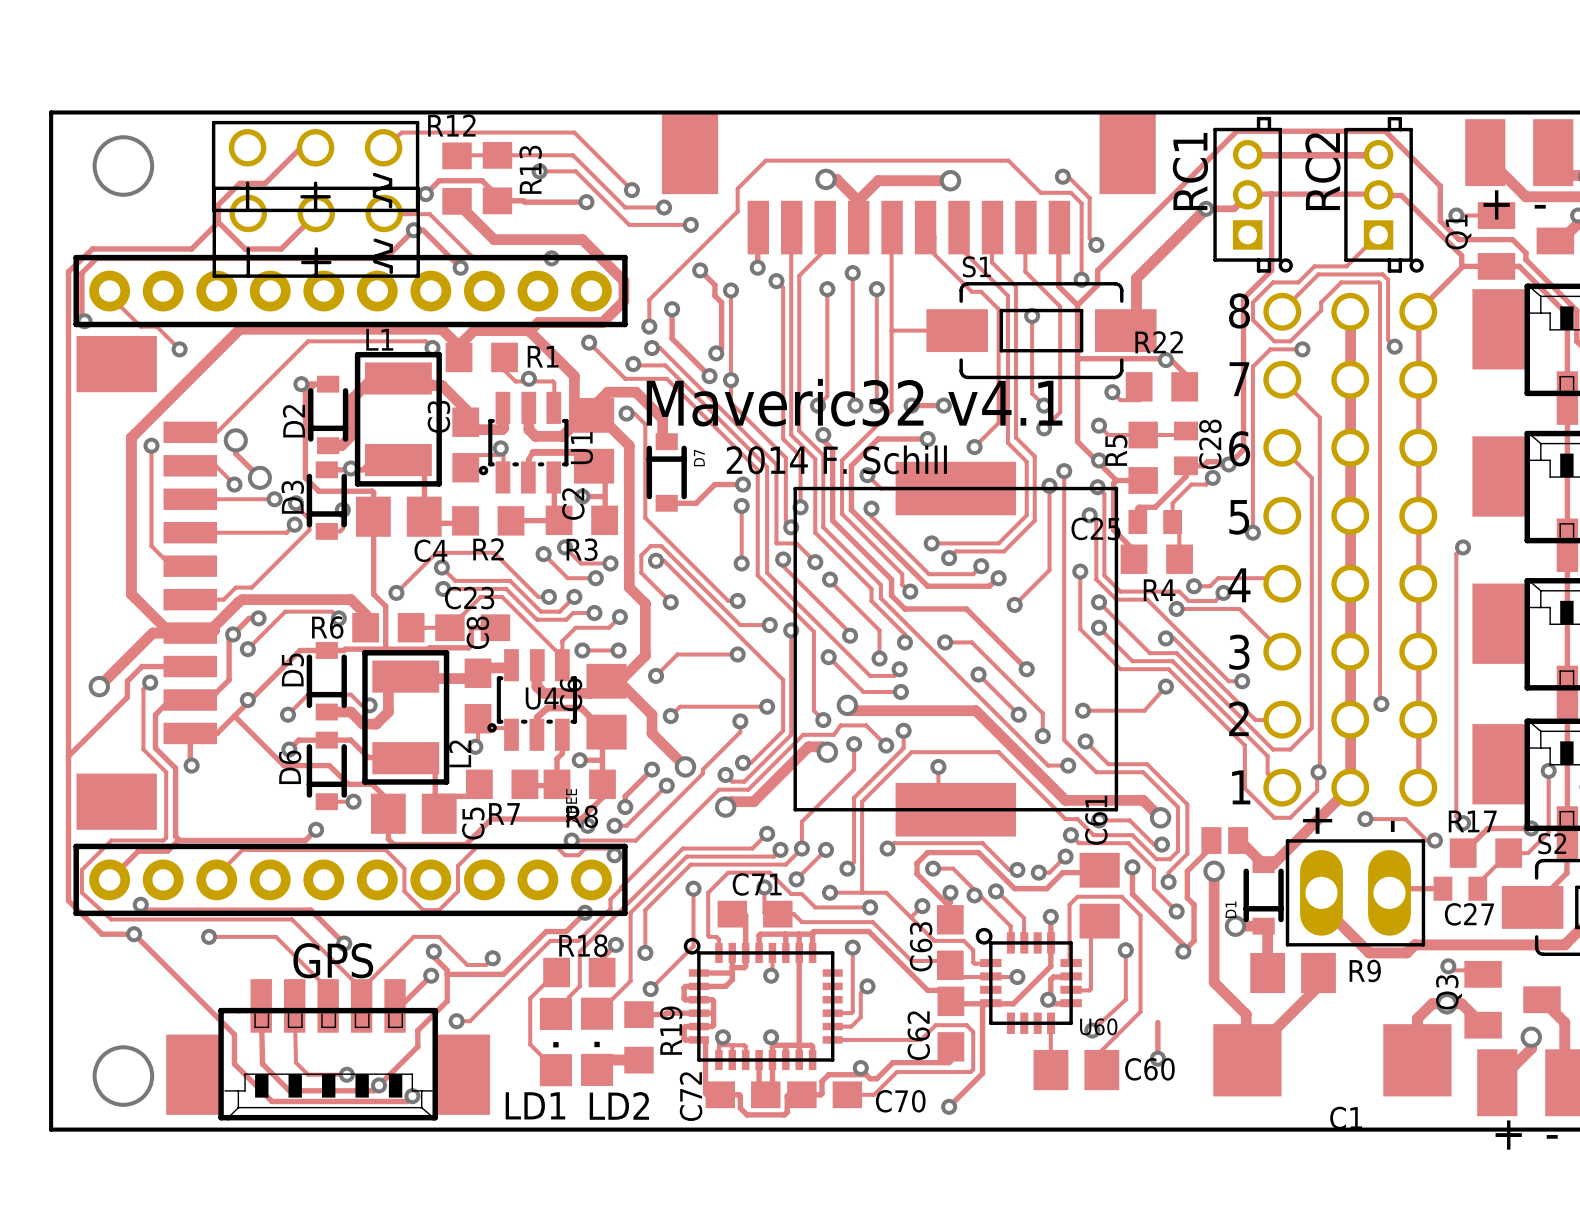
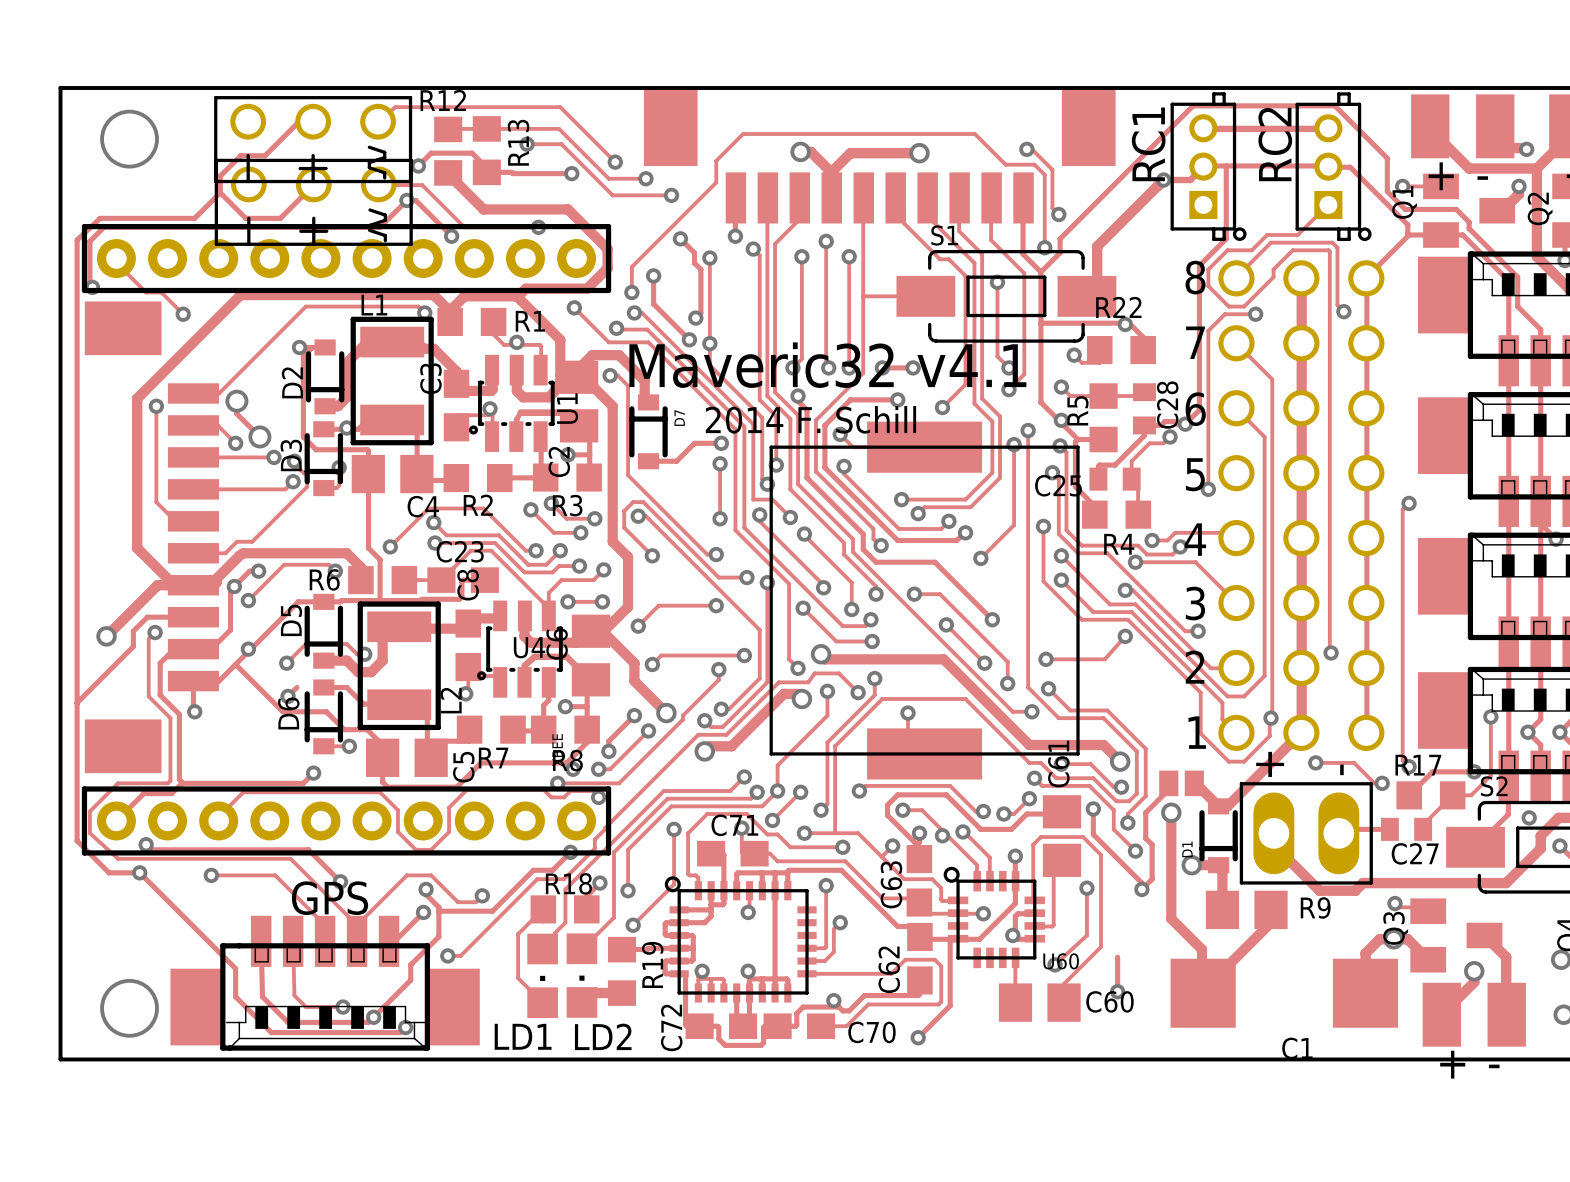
track: (298, 740) (326, 740) -> none

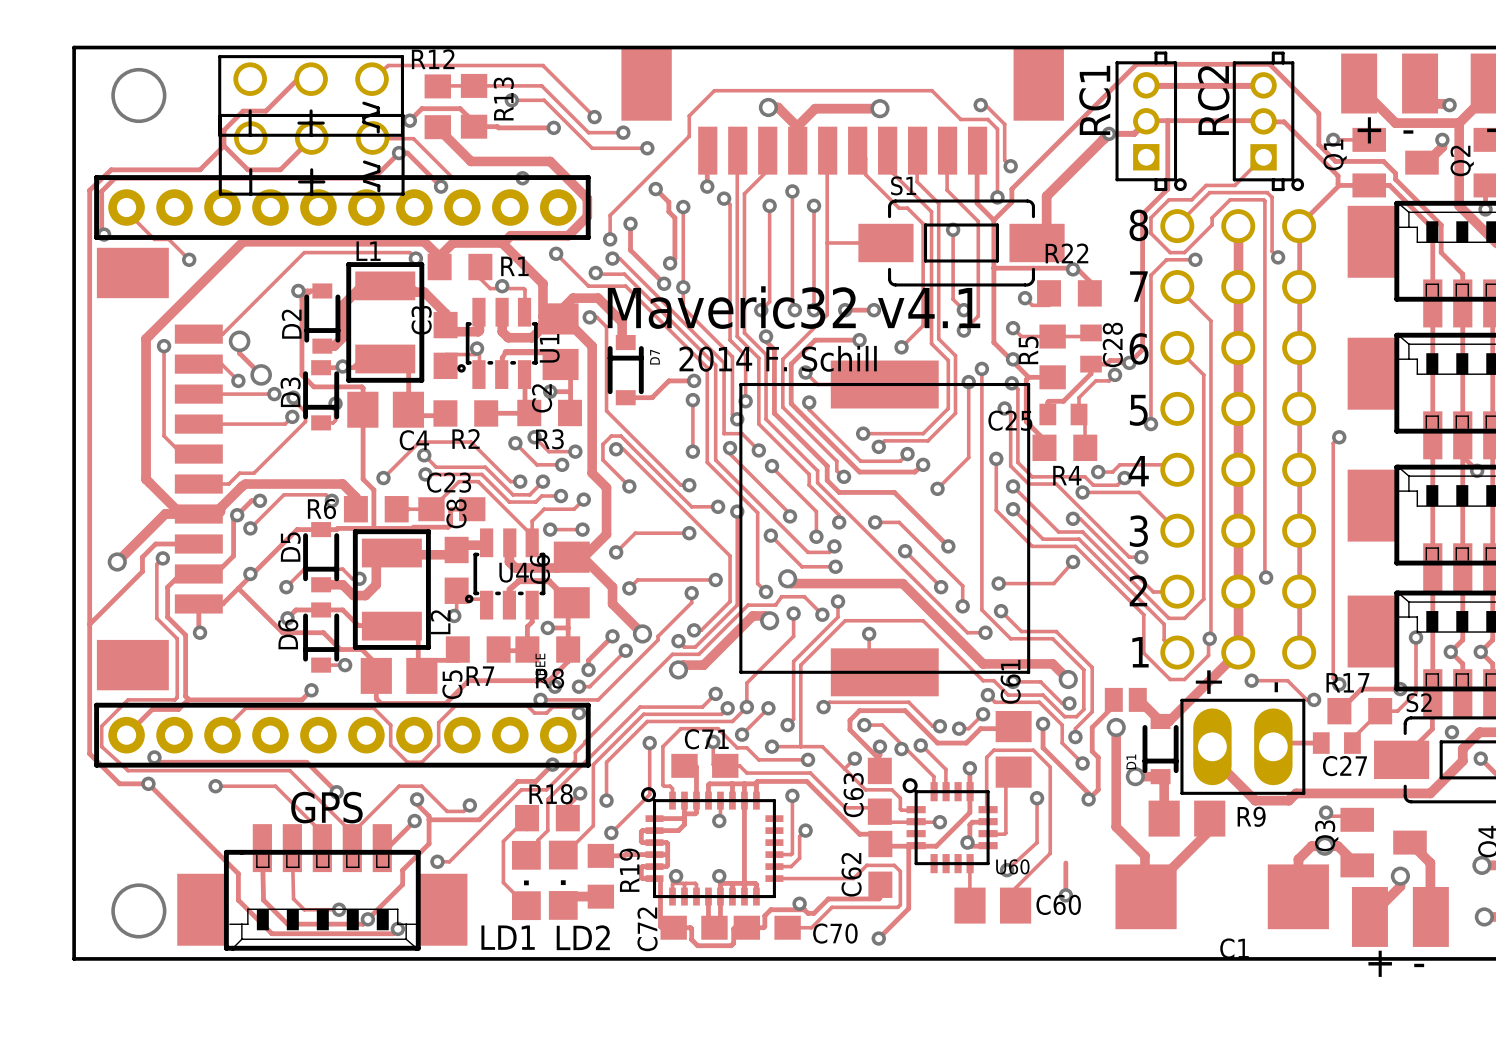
track: none -> (295, 609) (321, 609)

